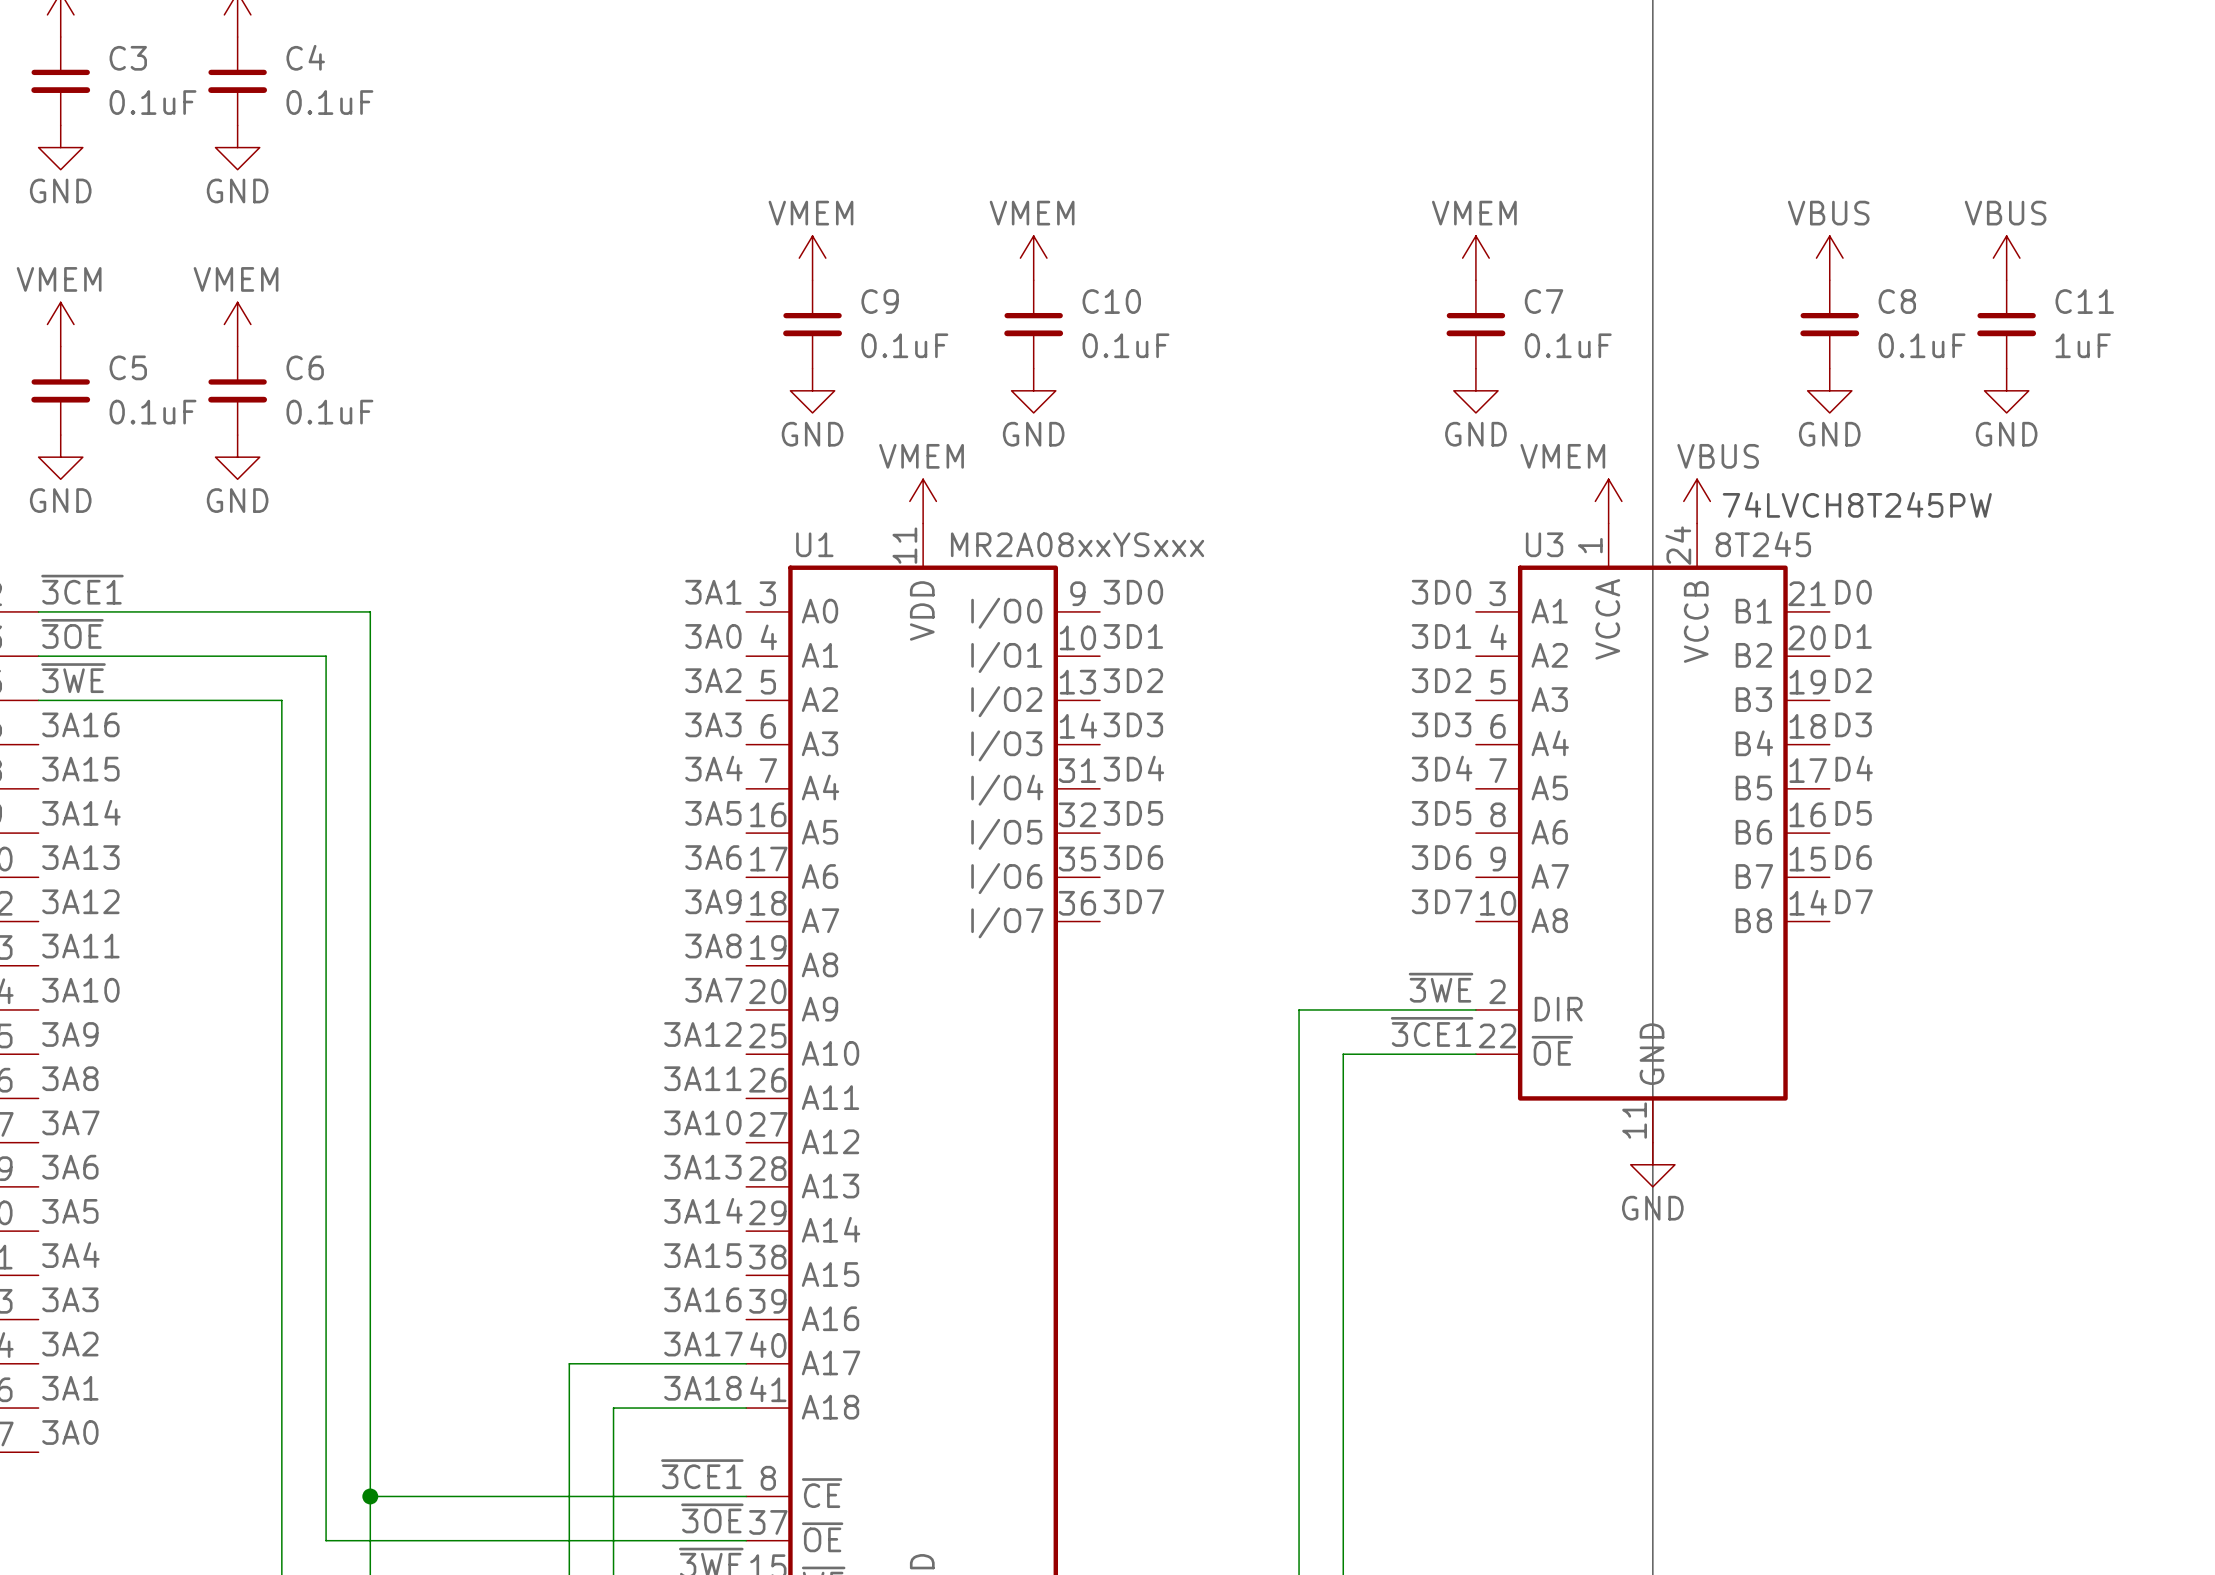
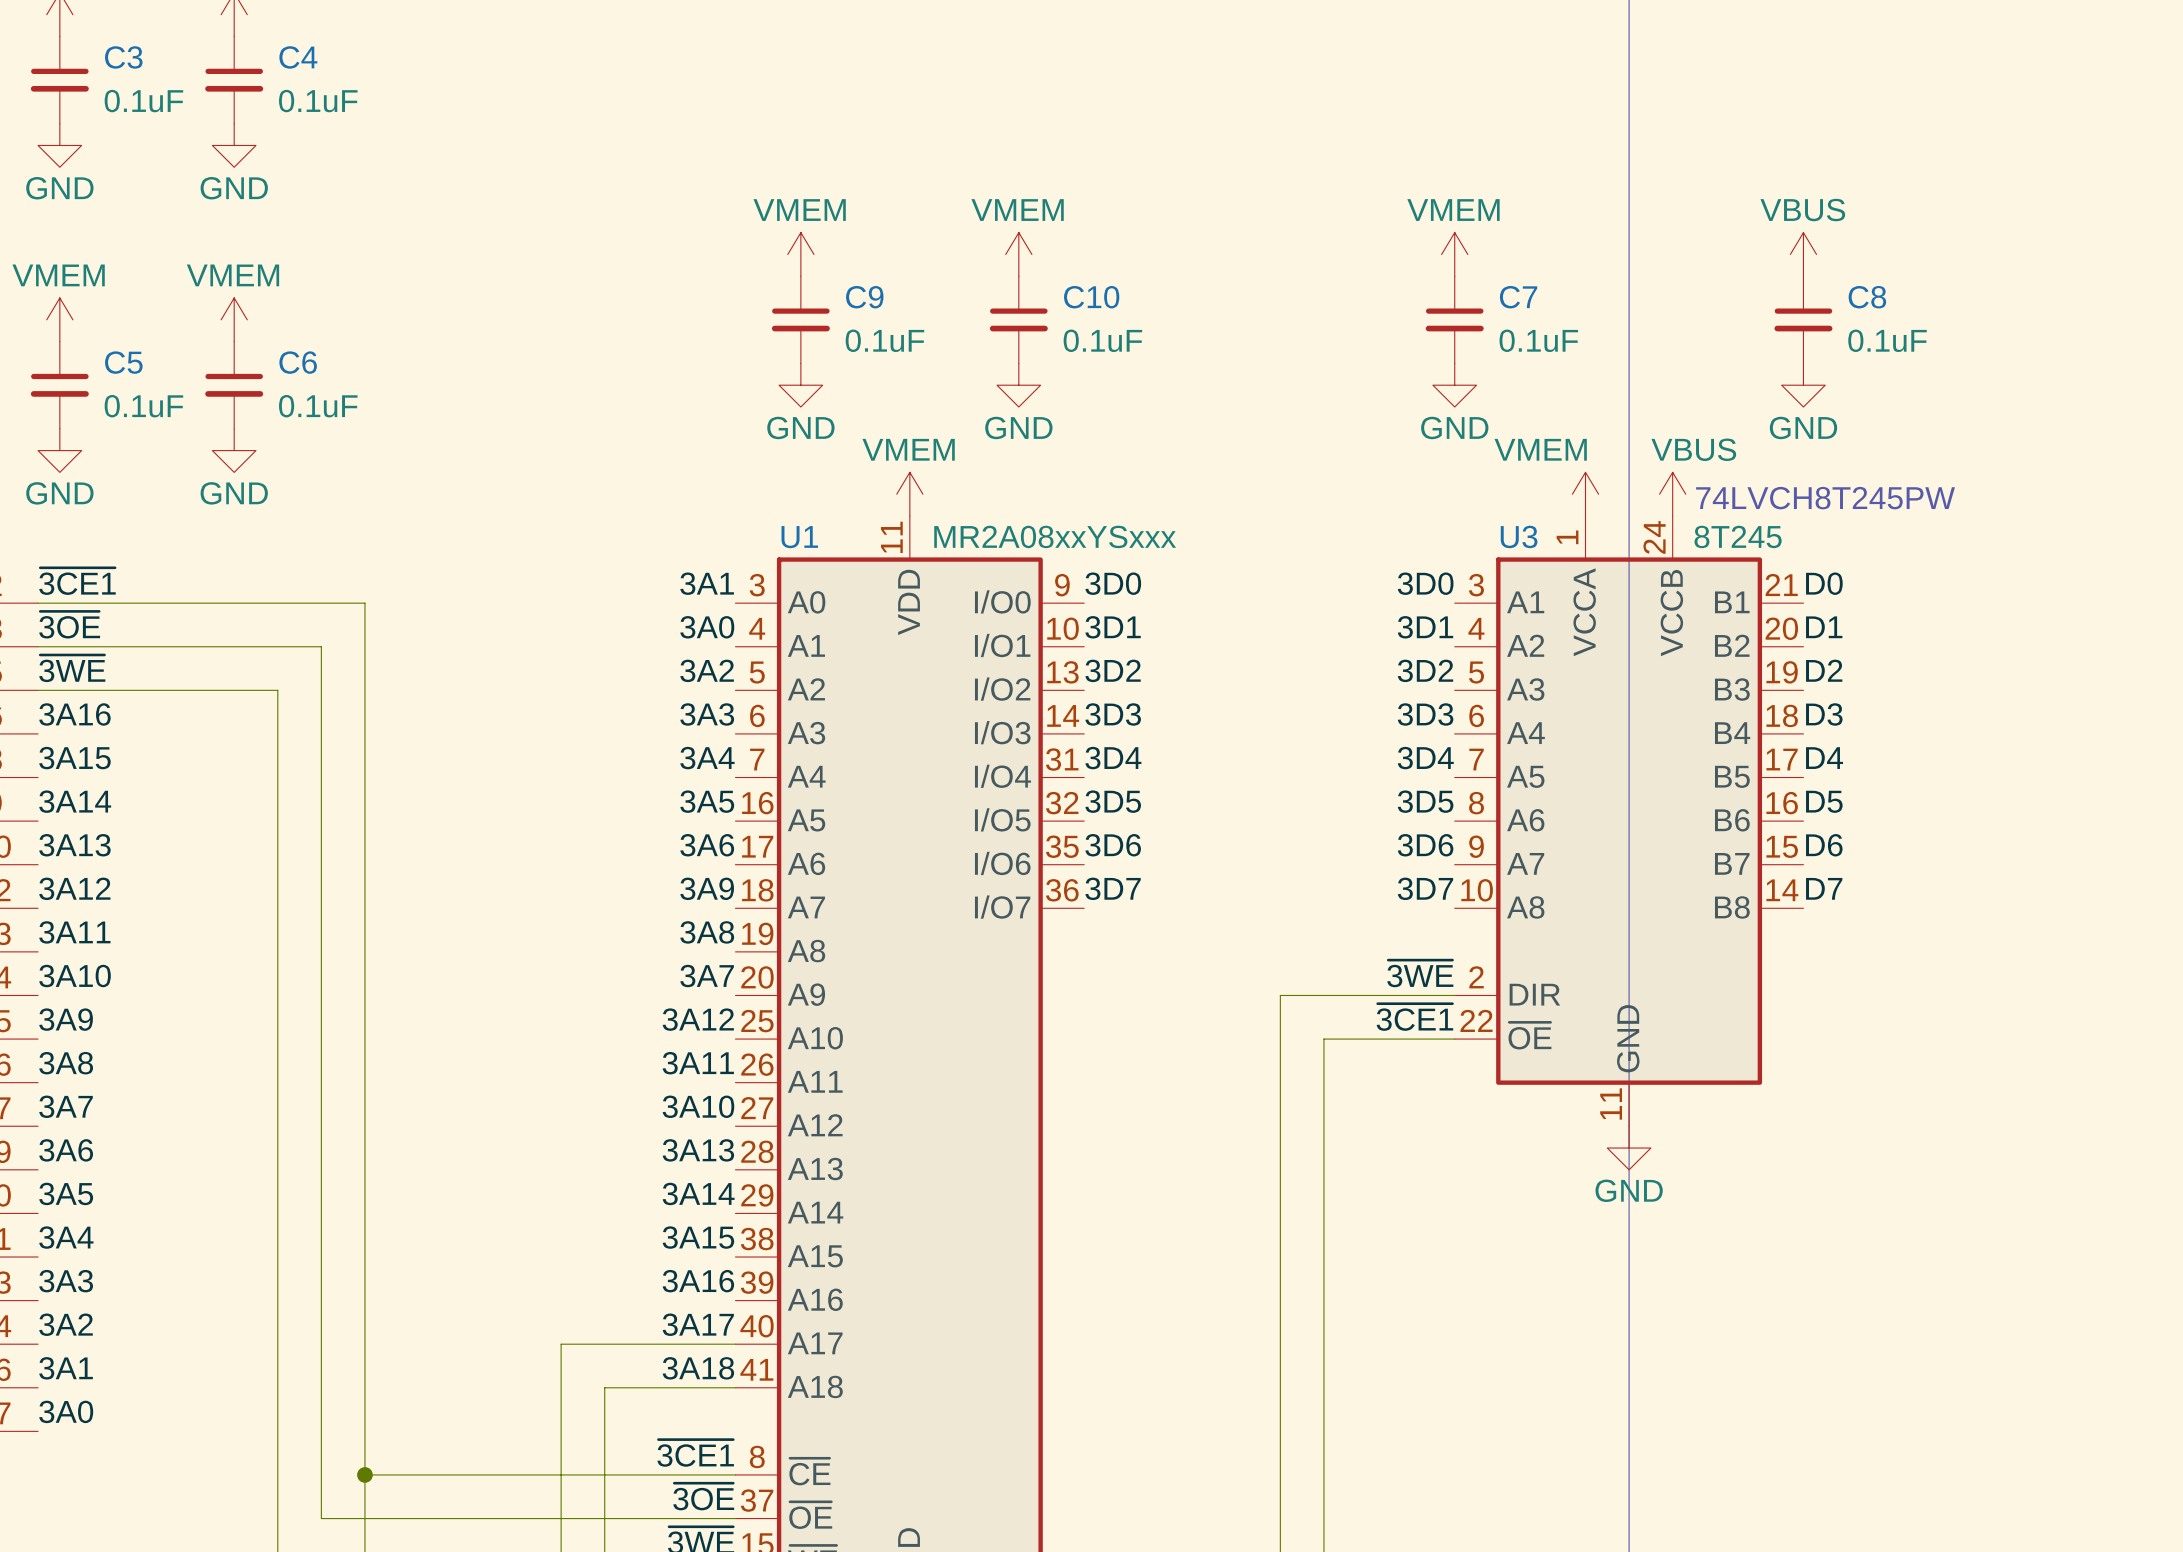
power symbol: VBUS (2006, 258) -> none
C11: 1uF (2006, 324) -> none
power symbol: GND (2006, 390) -> none

